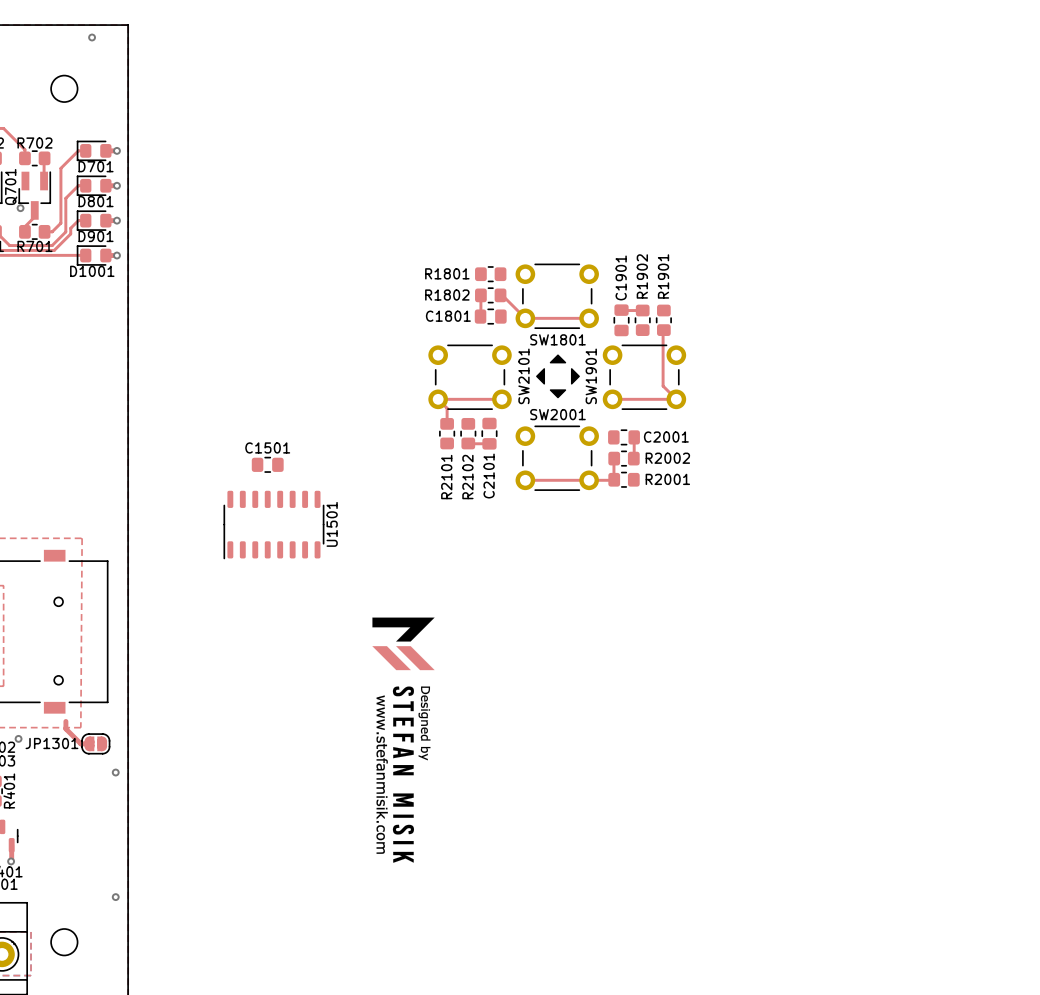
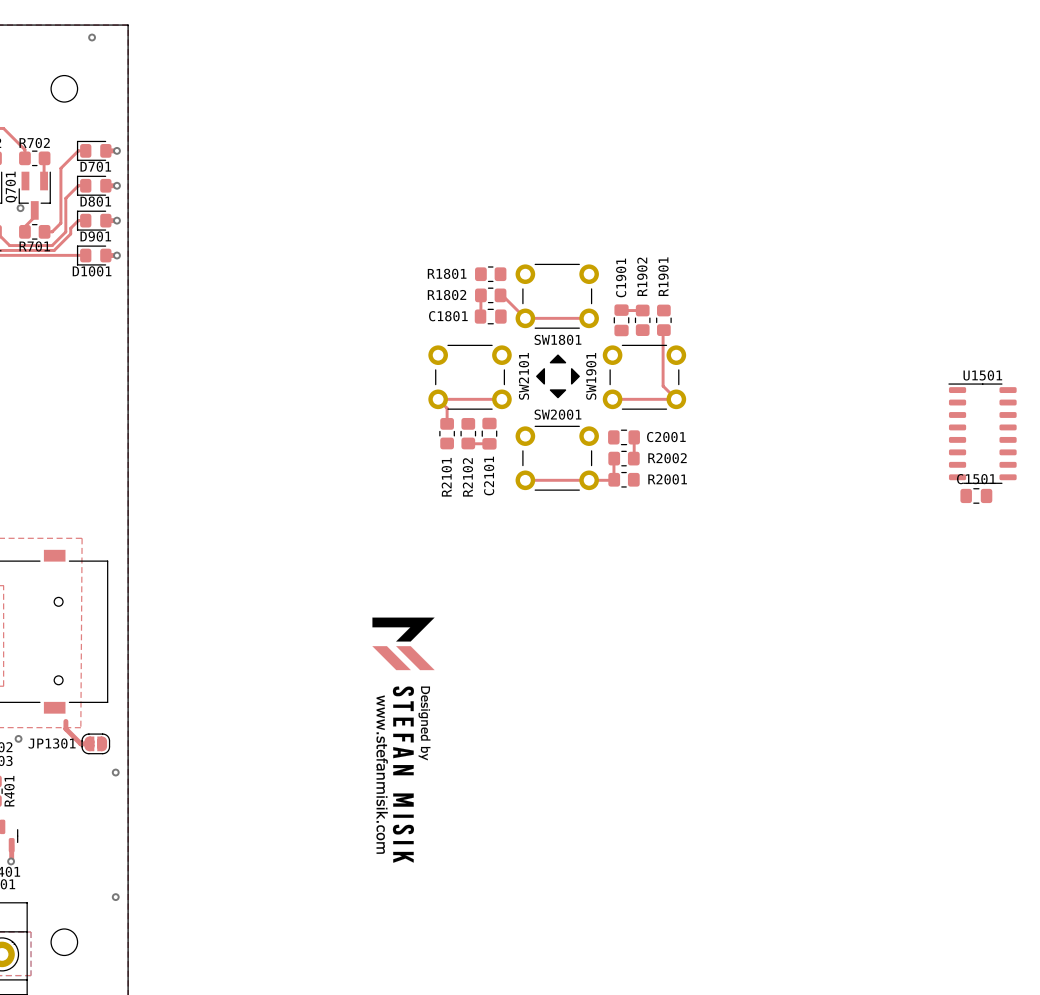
C1501 position: (267, 464) -> (976, 495)
U1501 rotation: 0° (273, 524) -> 90° clockwise (982, 433)
U1501 position: (273, 524) -> (982, 433)
U1501 name position: U1501 (332, 524) -> U1501 (982, 375)

